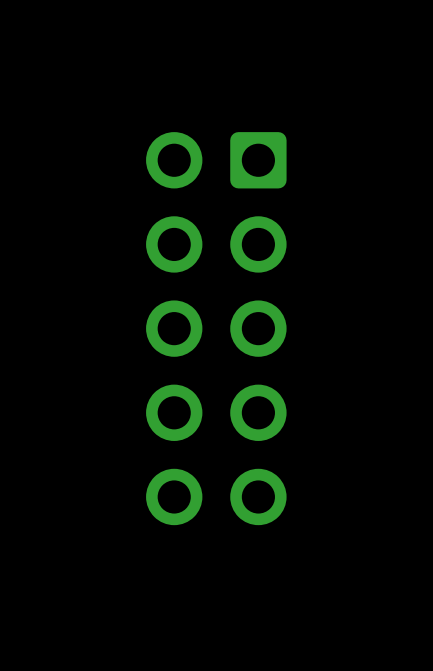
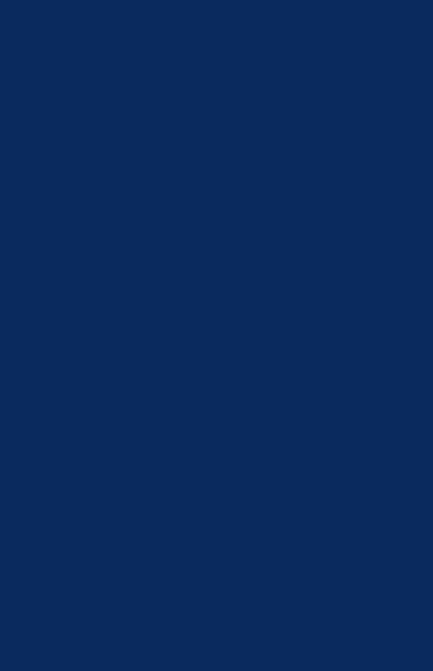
part: (216, 328) -> none

